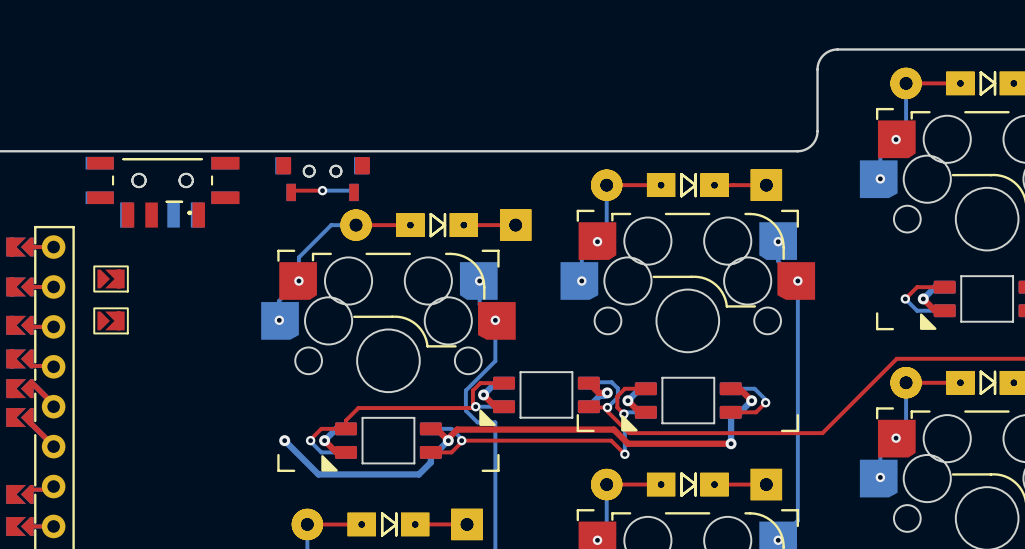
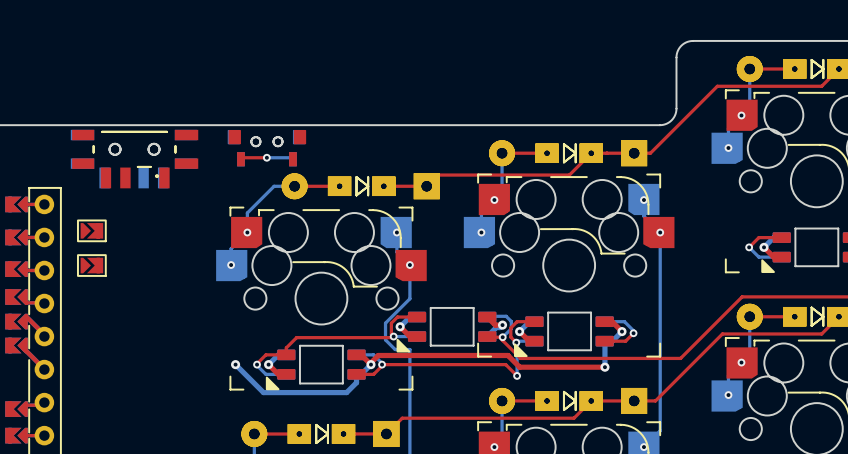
top track: none -> (838, 69) (821, 86) (717, 86) (650, 153) (634, 153)
top track: none -> (591, 153) (569, 175) (437, 175) (426, 186)
top track: none -> (838, 316) (821, 333) (722, 333) (655, 400) (634, 400)
top track: none -> (591, 400) (573, 418) (402, 418) (386, 434)

